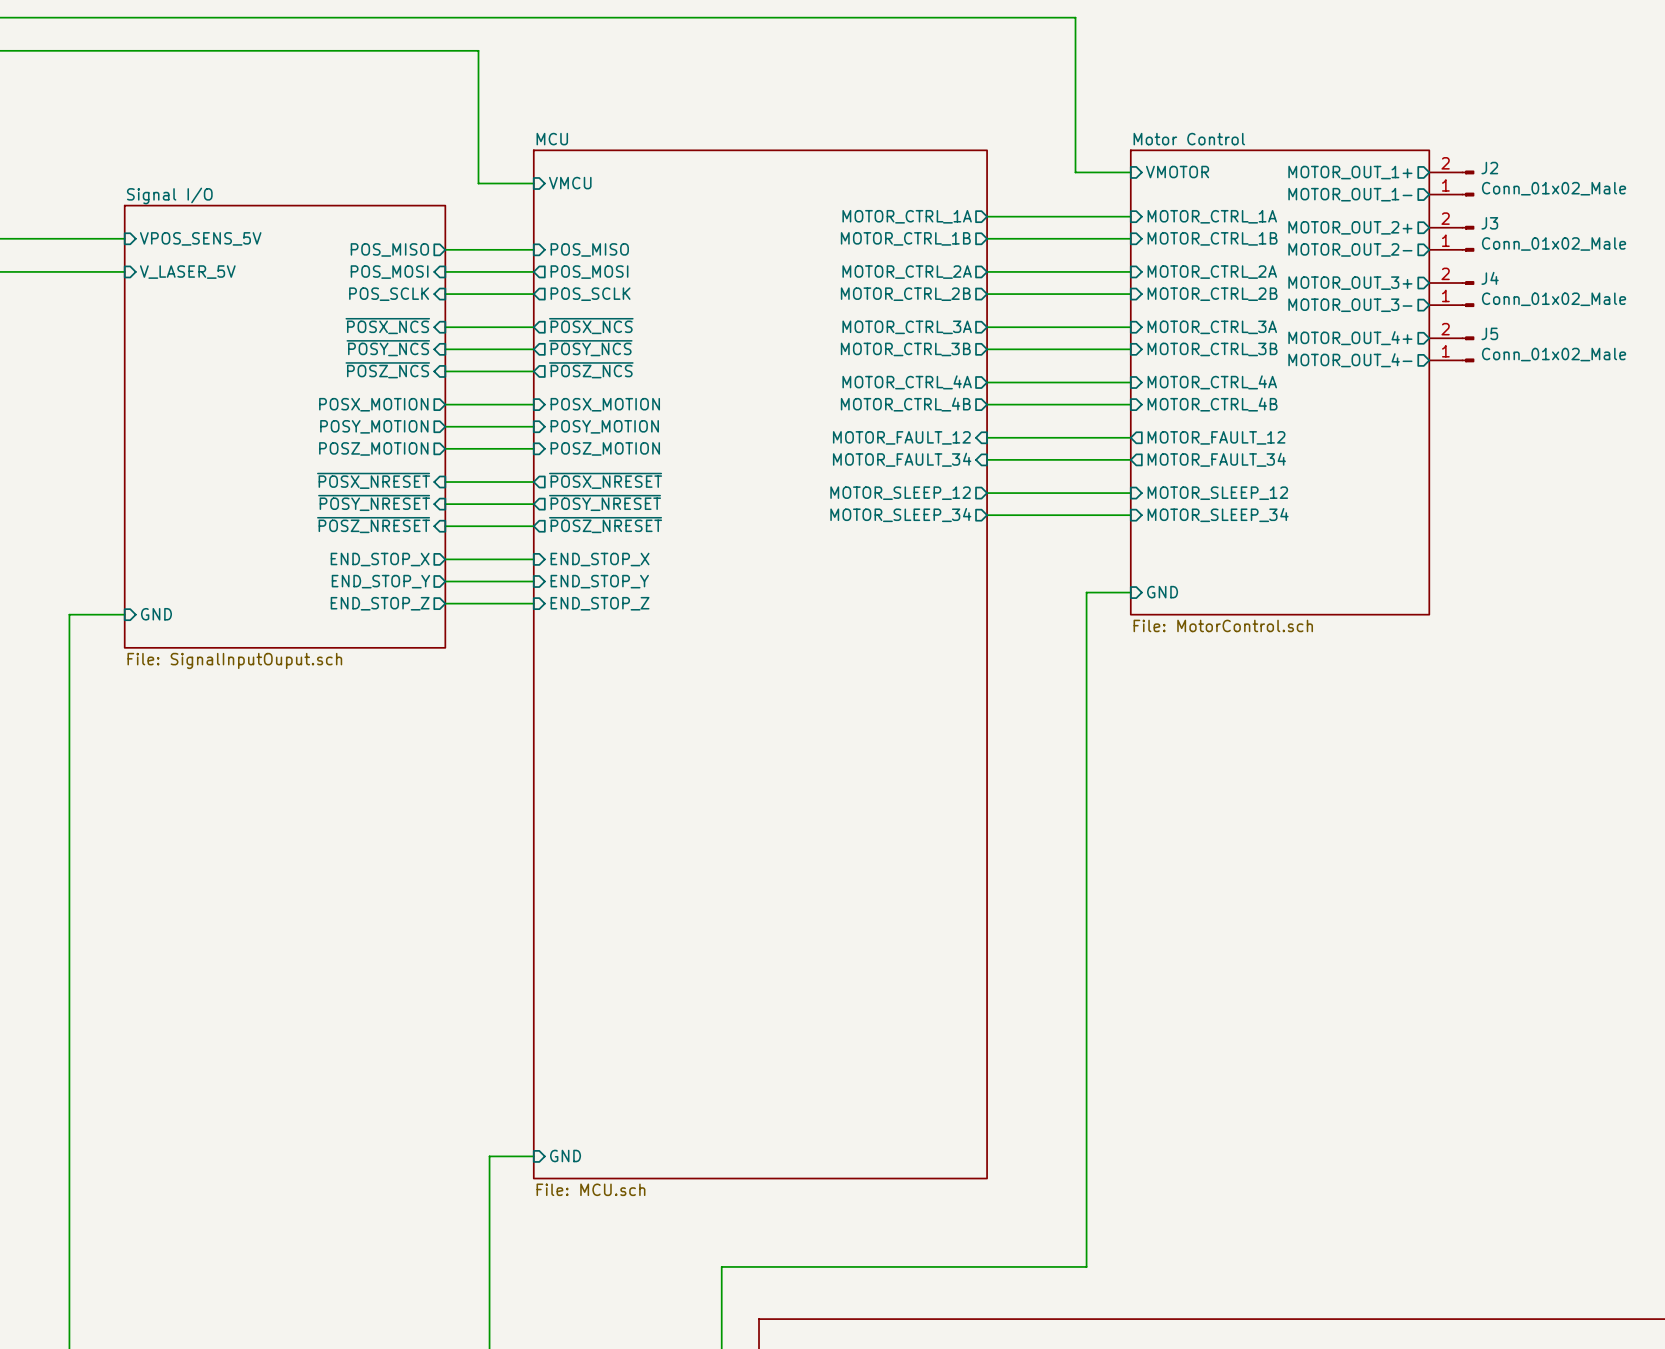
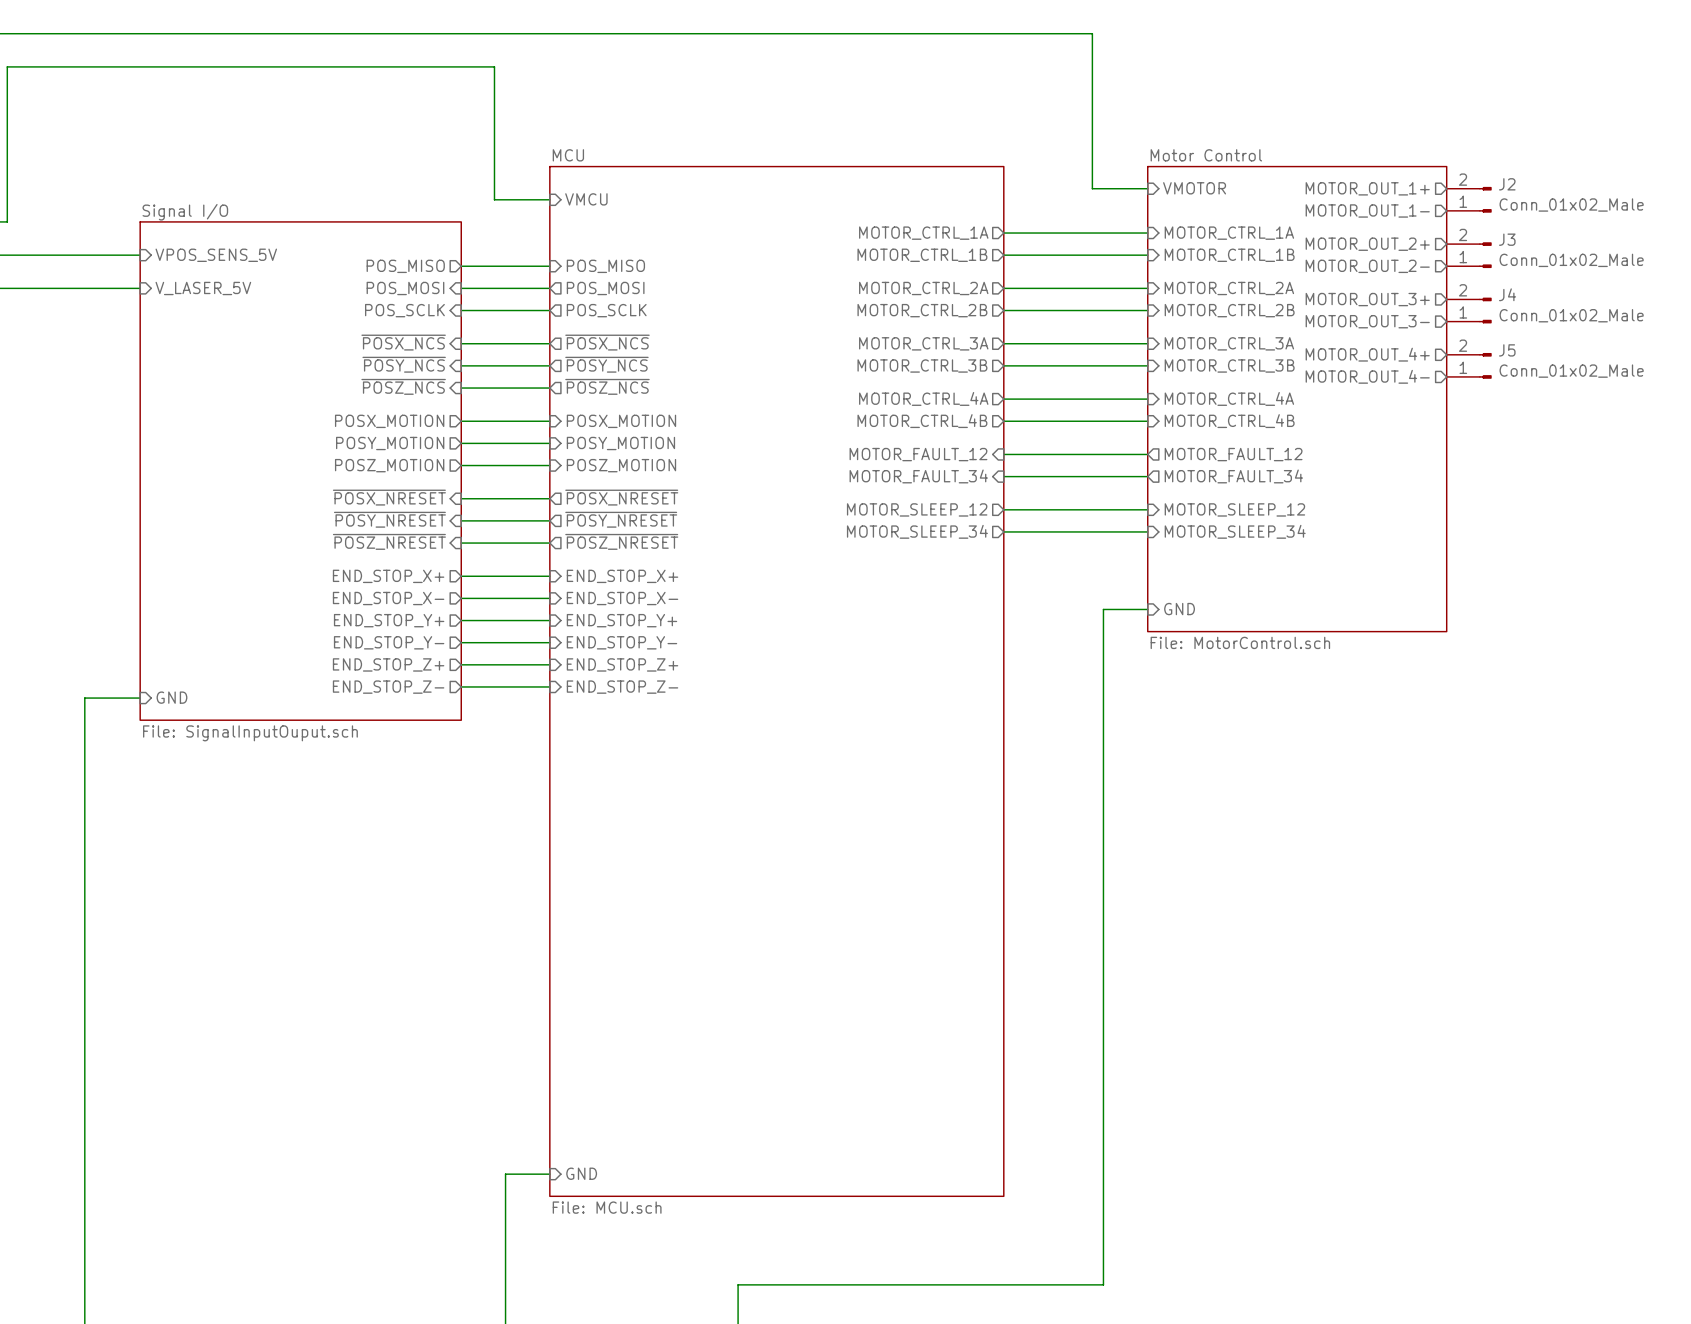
sheet Signal I/O: File: SignalInputOuput.sch (285, 426) -> none
sheet Signal I/O: none -> File: SignalInputOuput.sch (300, 471)
sheet pin: END_STOP_X (380, 559) -> END_STOP_X+ (388, 576)
sheet pin: END_STOP_X (600, 559) -> END_STOP_X+ (622, 576)
sheet pin: END_STOP_Y (380, 581) -> END_STOP_X- (388, 598)
sheet pin: END_STOP_Y (599, 581) -> END_STOP_X- (622, 598)
sheet pin: END_STOP_Z (380, 603) -> END_STOP_Y+ (389, 620)
sheet pin: END_STOP_Z (600, 603) -> END_STOP_Y+ (621, 620)
wire: (124, 614) (69, 614) (69, 681) -> (140, 698) (84, 698)
sheet pin position: GND (156, 614) -> GND (171, 697)
sheet pin: none -> END_STOP_Y- (389, 642)
wire: none -> (461, 642) (549, 642)
sheet pin: none -> END_STOP_Y- (621, 642)
sheet pin: none -> END_STOP_Z+ (388, 664)
wire: none -> (461, 664) (549, 664)
sheet pin: none -> END_STOP_Z+ (622, 664)
wire: none -> (461, 686) (549, 686)
sheet pin: none -> END_STOP_Z- (388, 687)
sheet pin: none -> END_STOP_Z- (622, 687)

